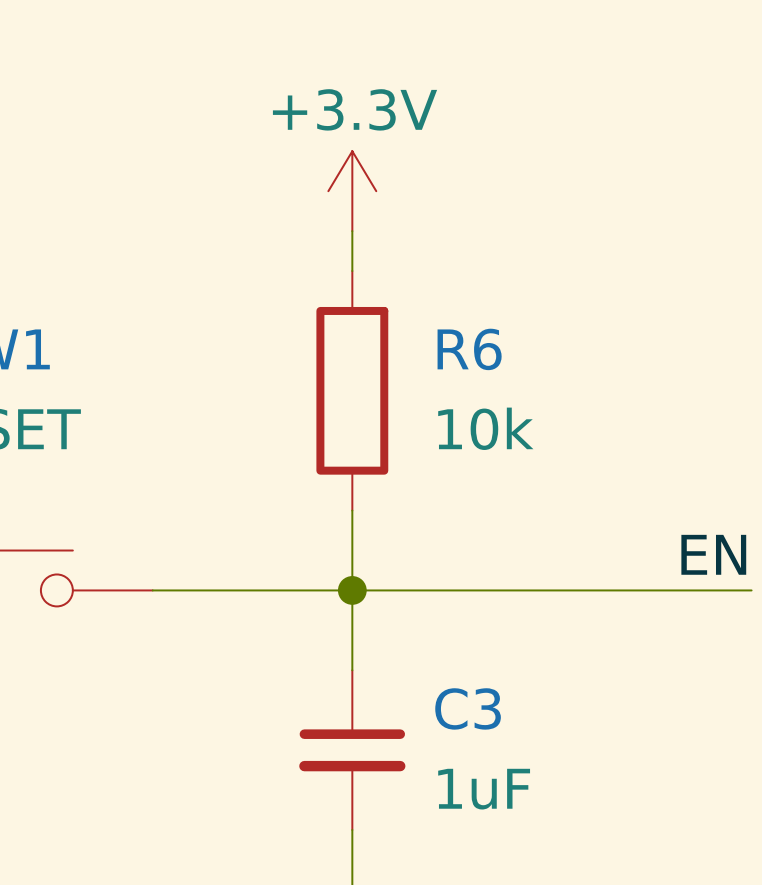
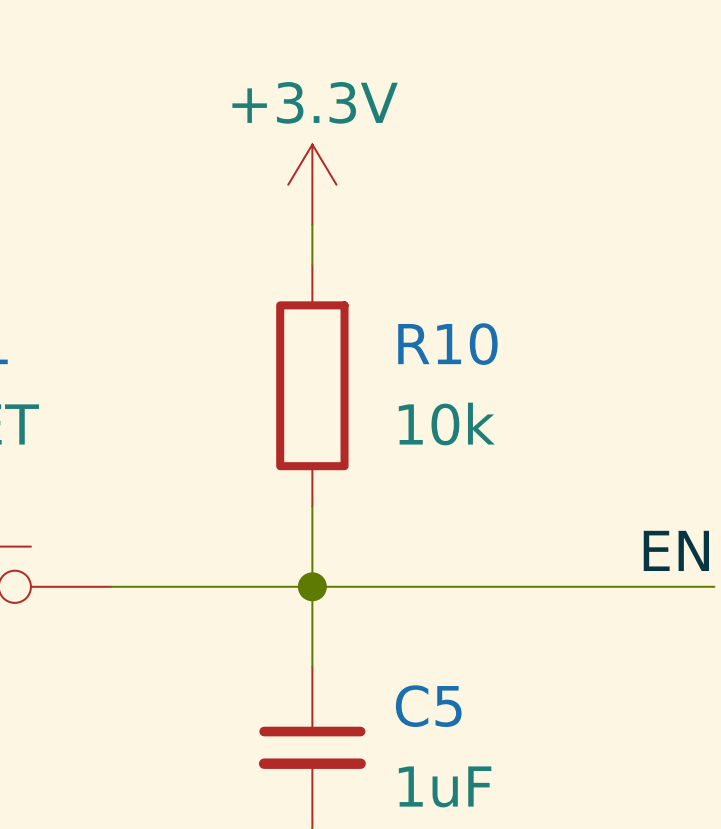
R6 name: R6 (469, 349) -> R10 (447, 344)
C3 name: C3 (468, 708) -> C5 (428, 706)

